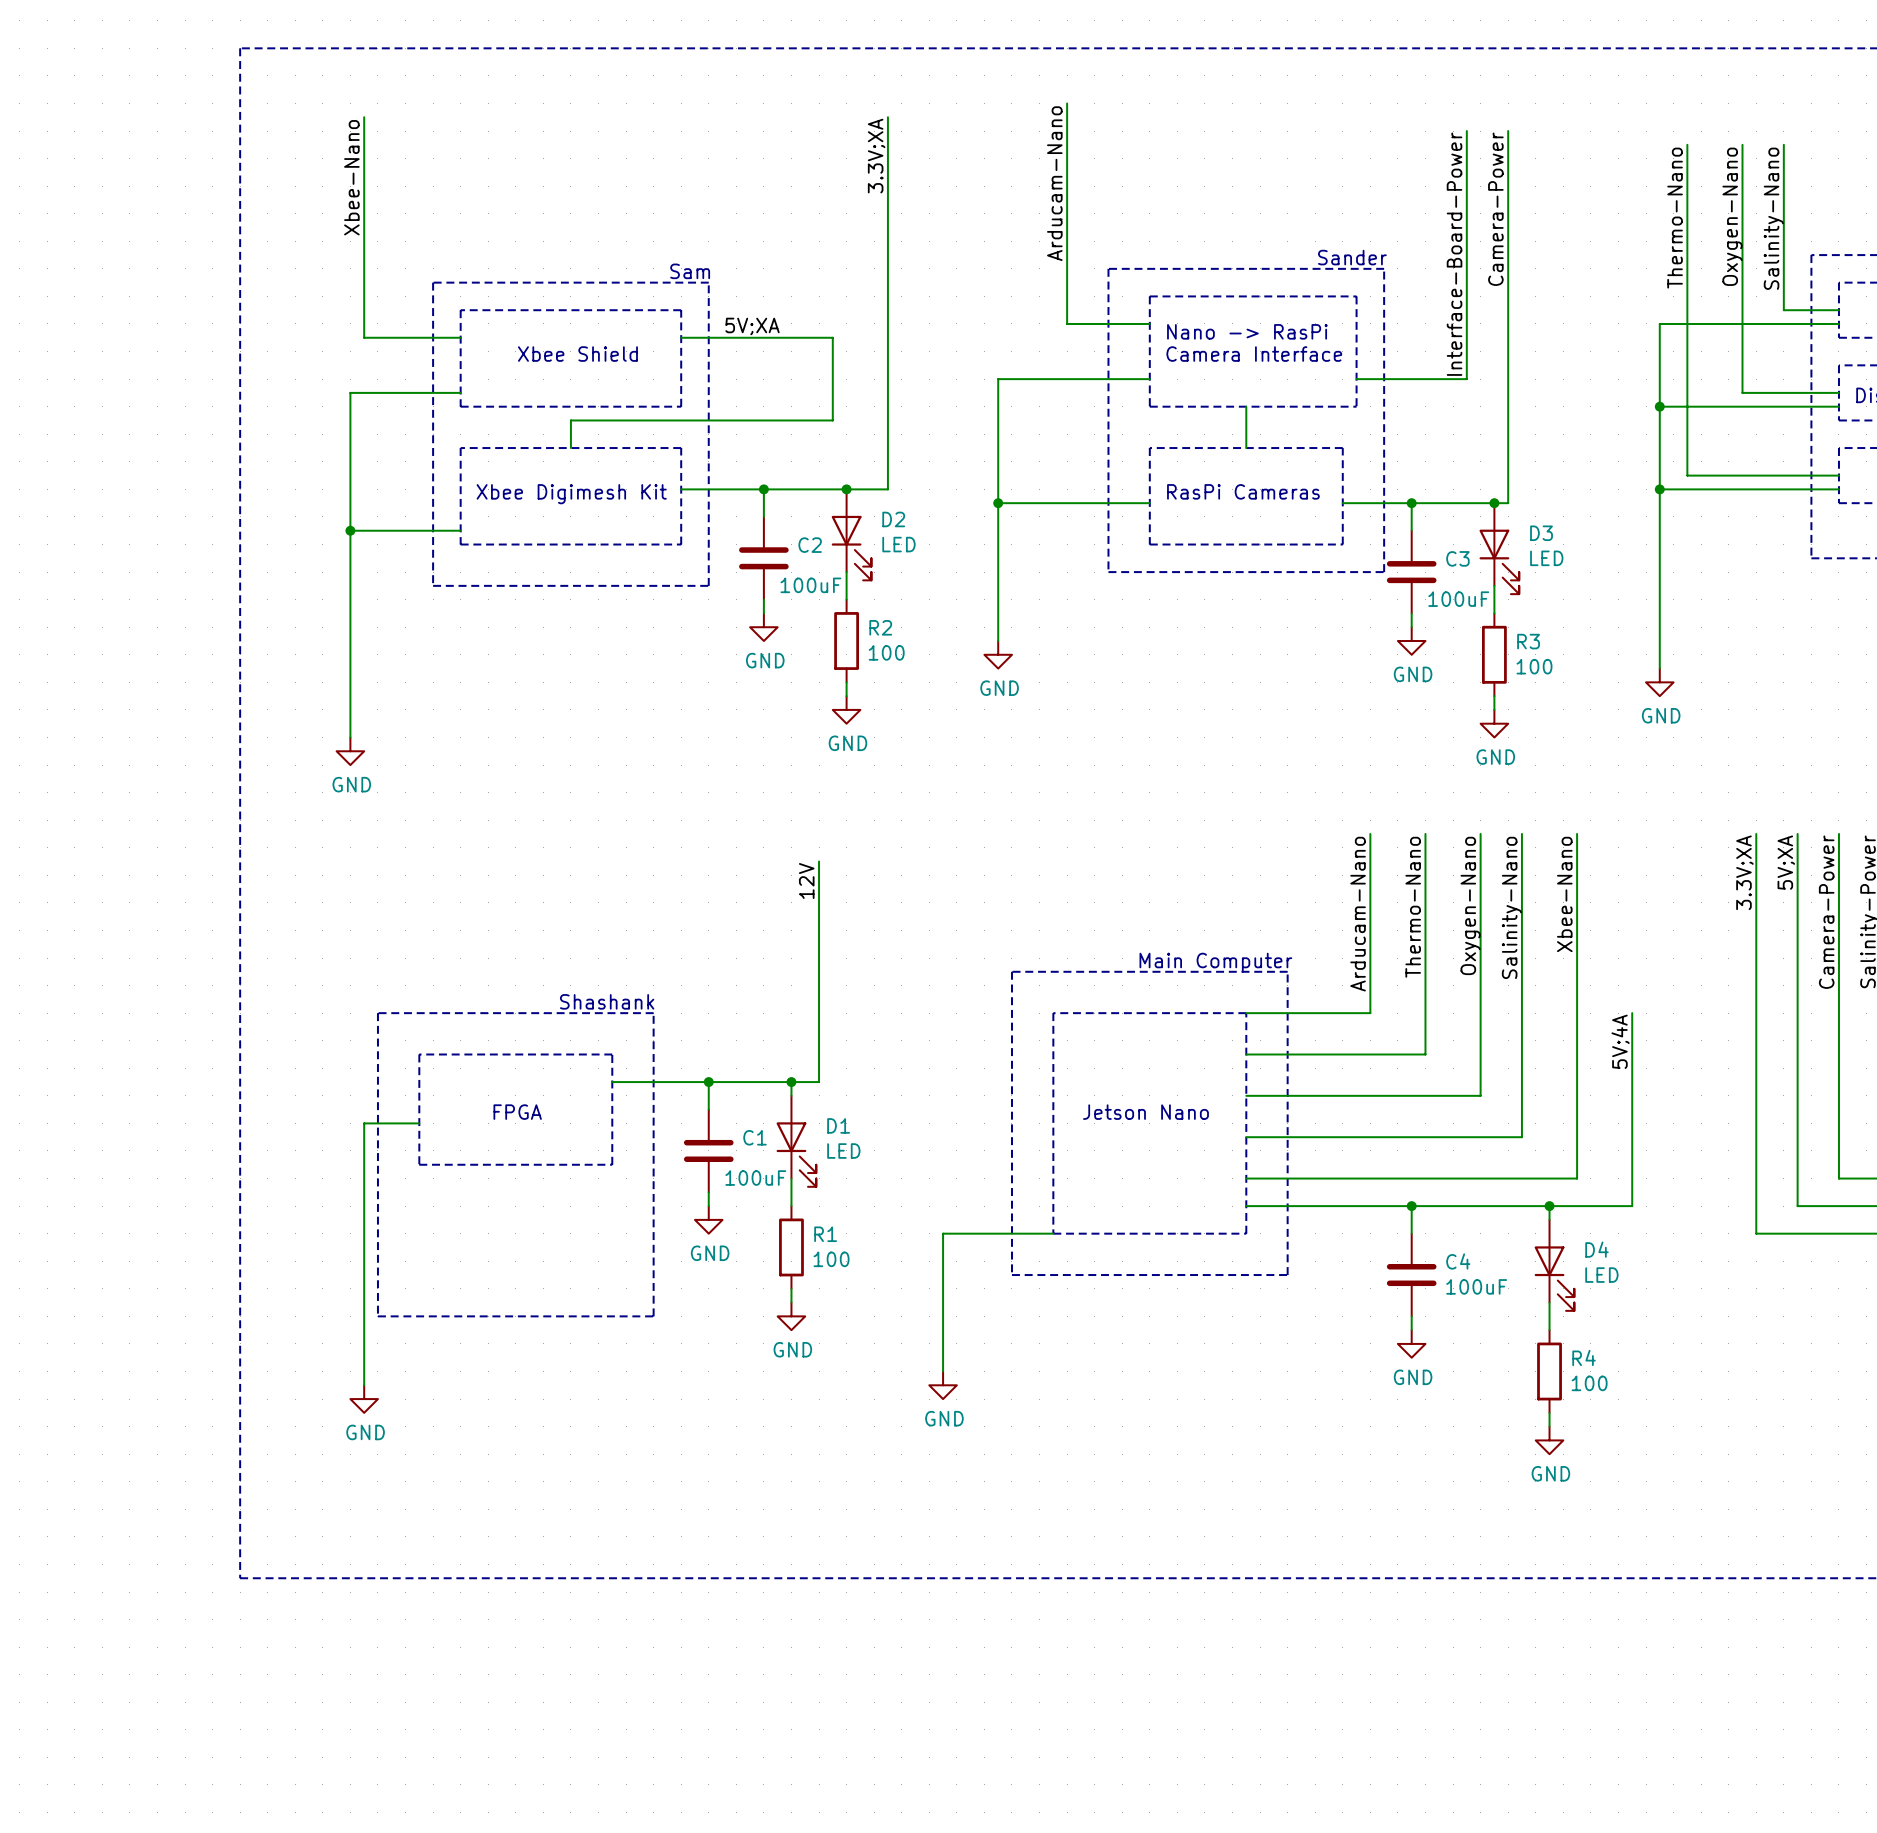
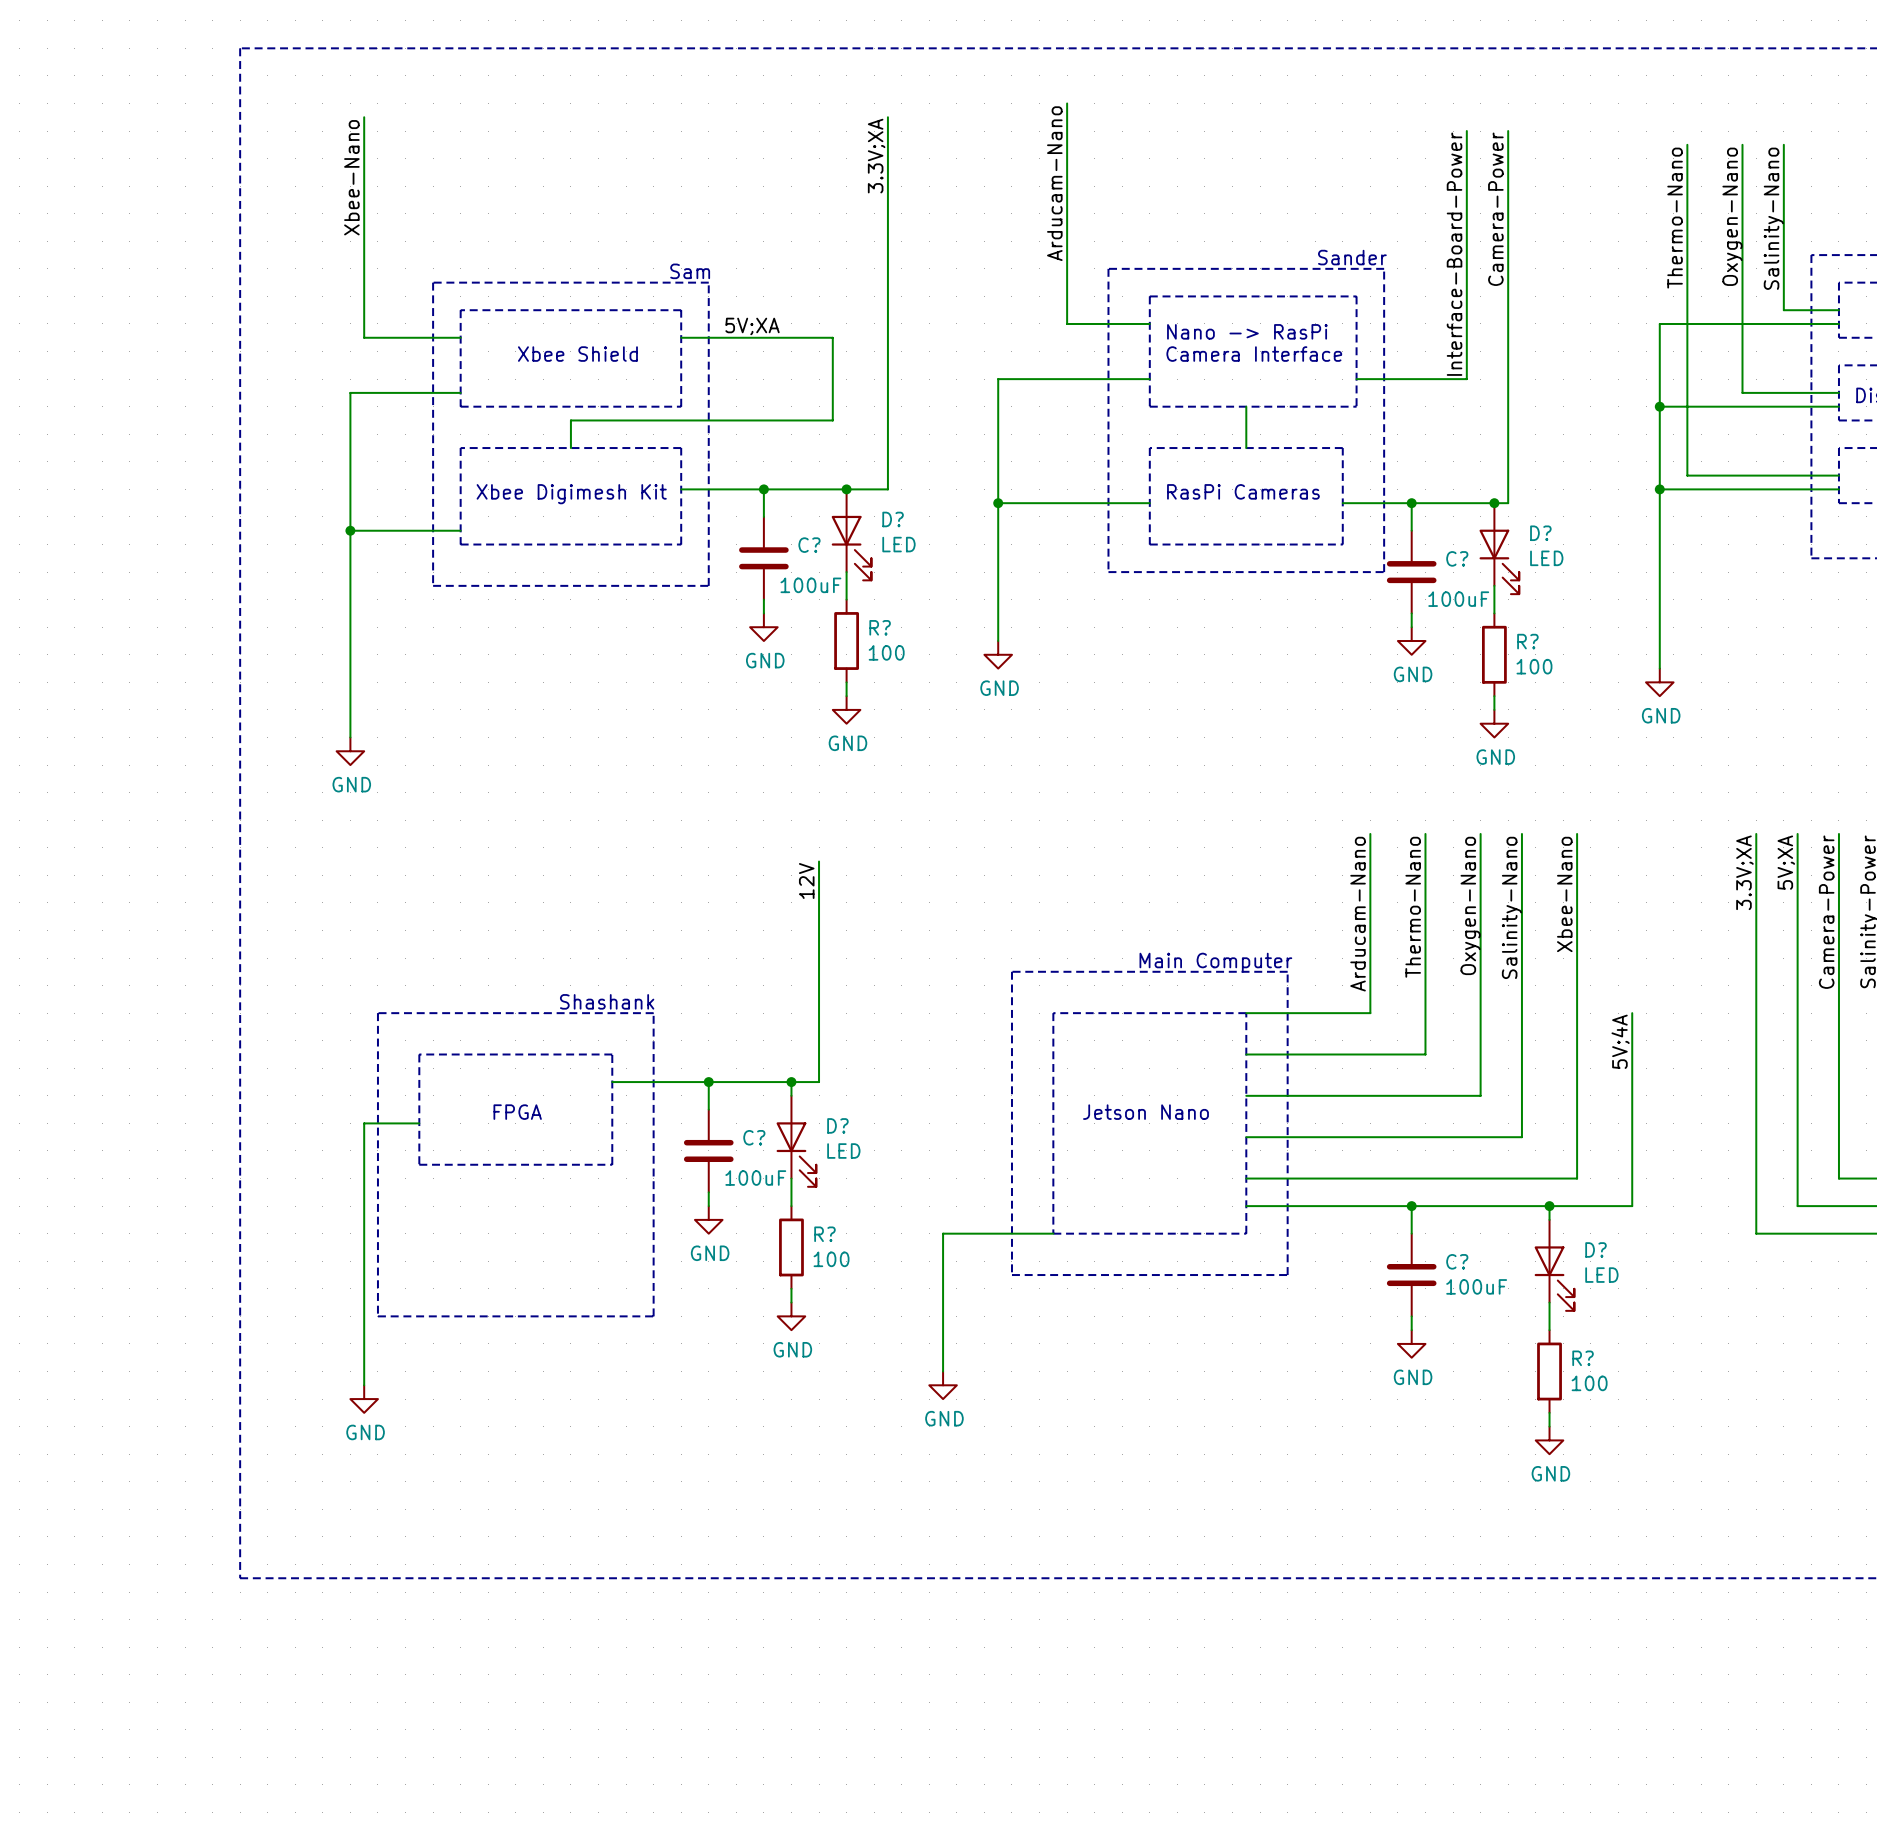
D2 name: D2 (893, 519) -> D? (893, 519)
D3 name: D3 (1541, 533) -> D? (1540, 533)
C2 name: C2 (810, 545) -> C? (809, 545)
C3 name: C3 (1457, 558) -> C? (1457, 558)
R2 name: R2 (880, 627) -> R? (880, 627)
R3 name: R3 (1528, 641) -> R? (1527, 641)
D1 name: D1 (838, 1125) -> D? (837, 1125)
C1 name: C1 (755, 1137) -> C? (754, 1137)
R1 name: R1 (825, 1234) -> R? (824, 1234)
D4 name: D4 (1596, 1249) -> D? (1595, 1249)
C4 name: C4 (1458, 1261) -> C? (1457, 1261)
R4 name: R4 (1584, 1357) -> R? (1583, 1358)

